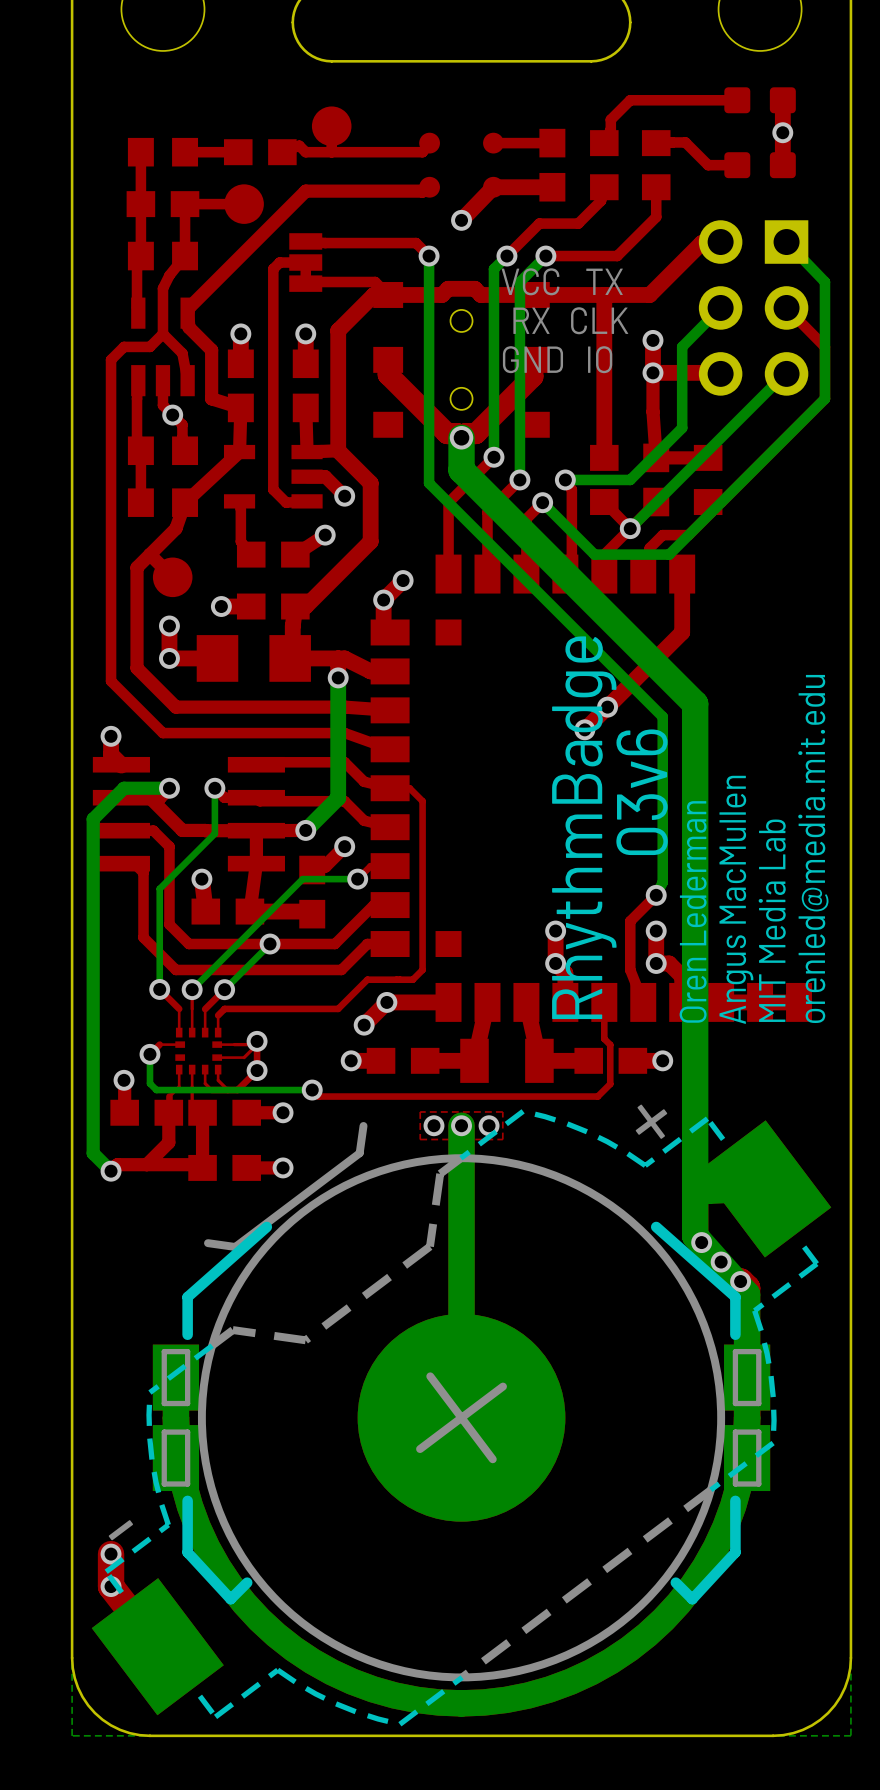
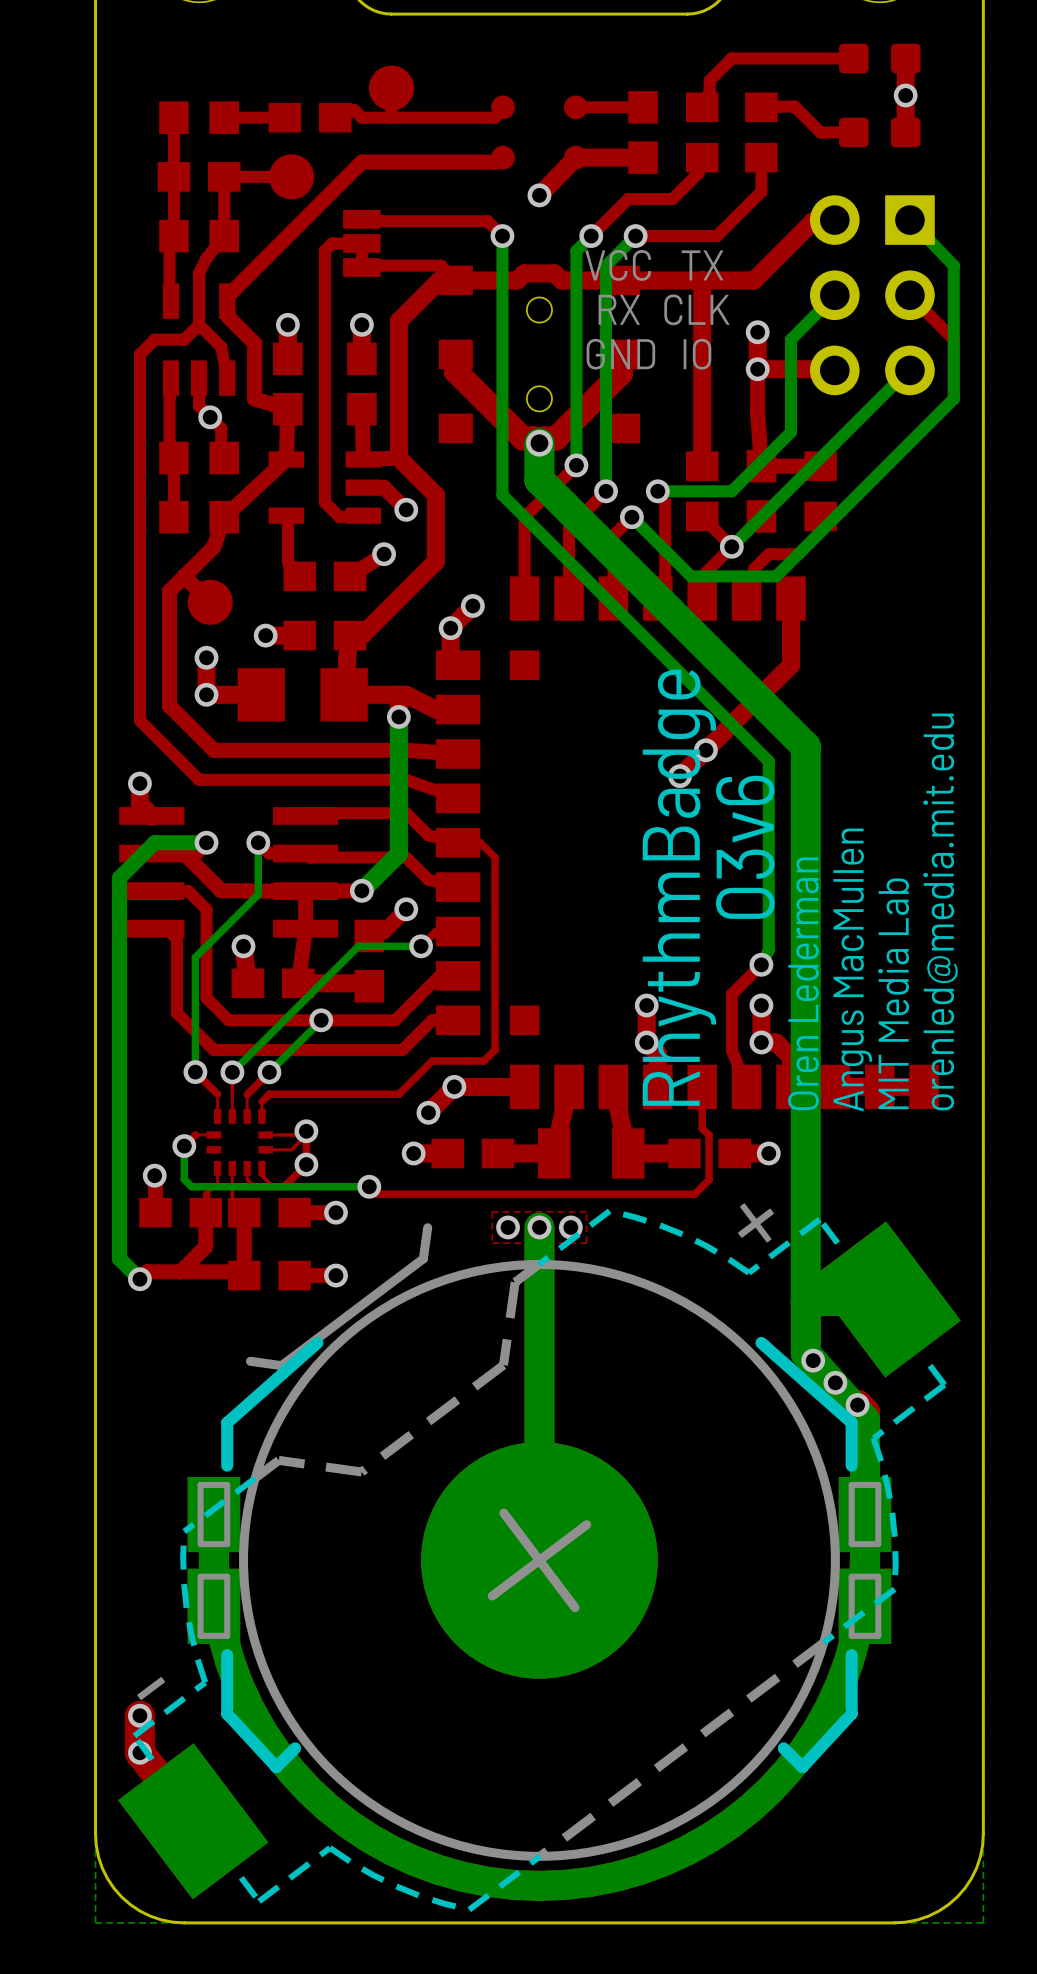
part footprint: [175, 1027, 223, 1075] -> [206, 1109, 274, 1176]

